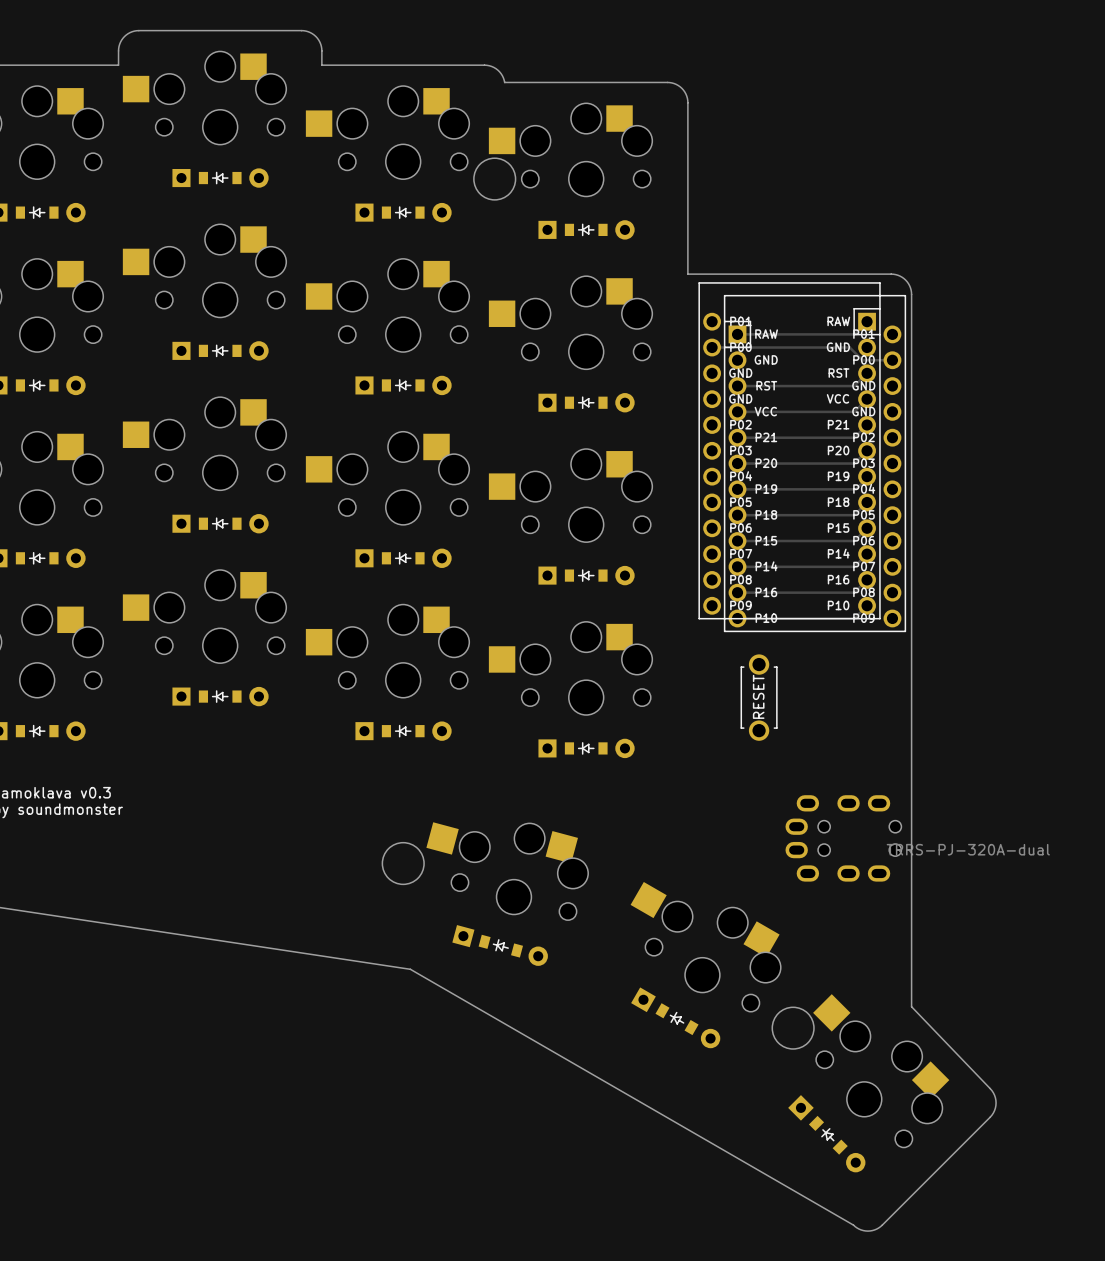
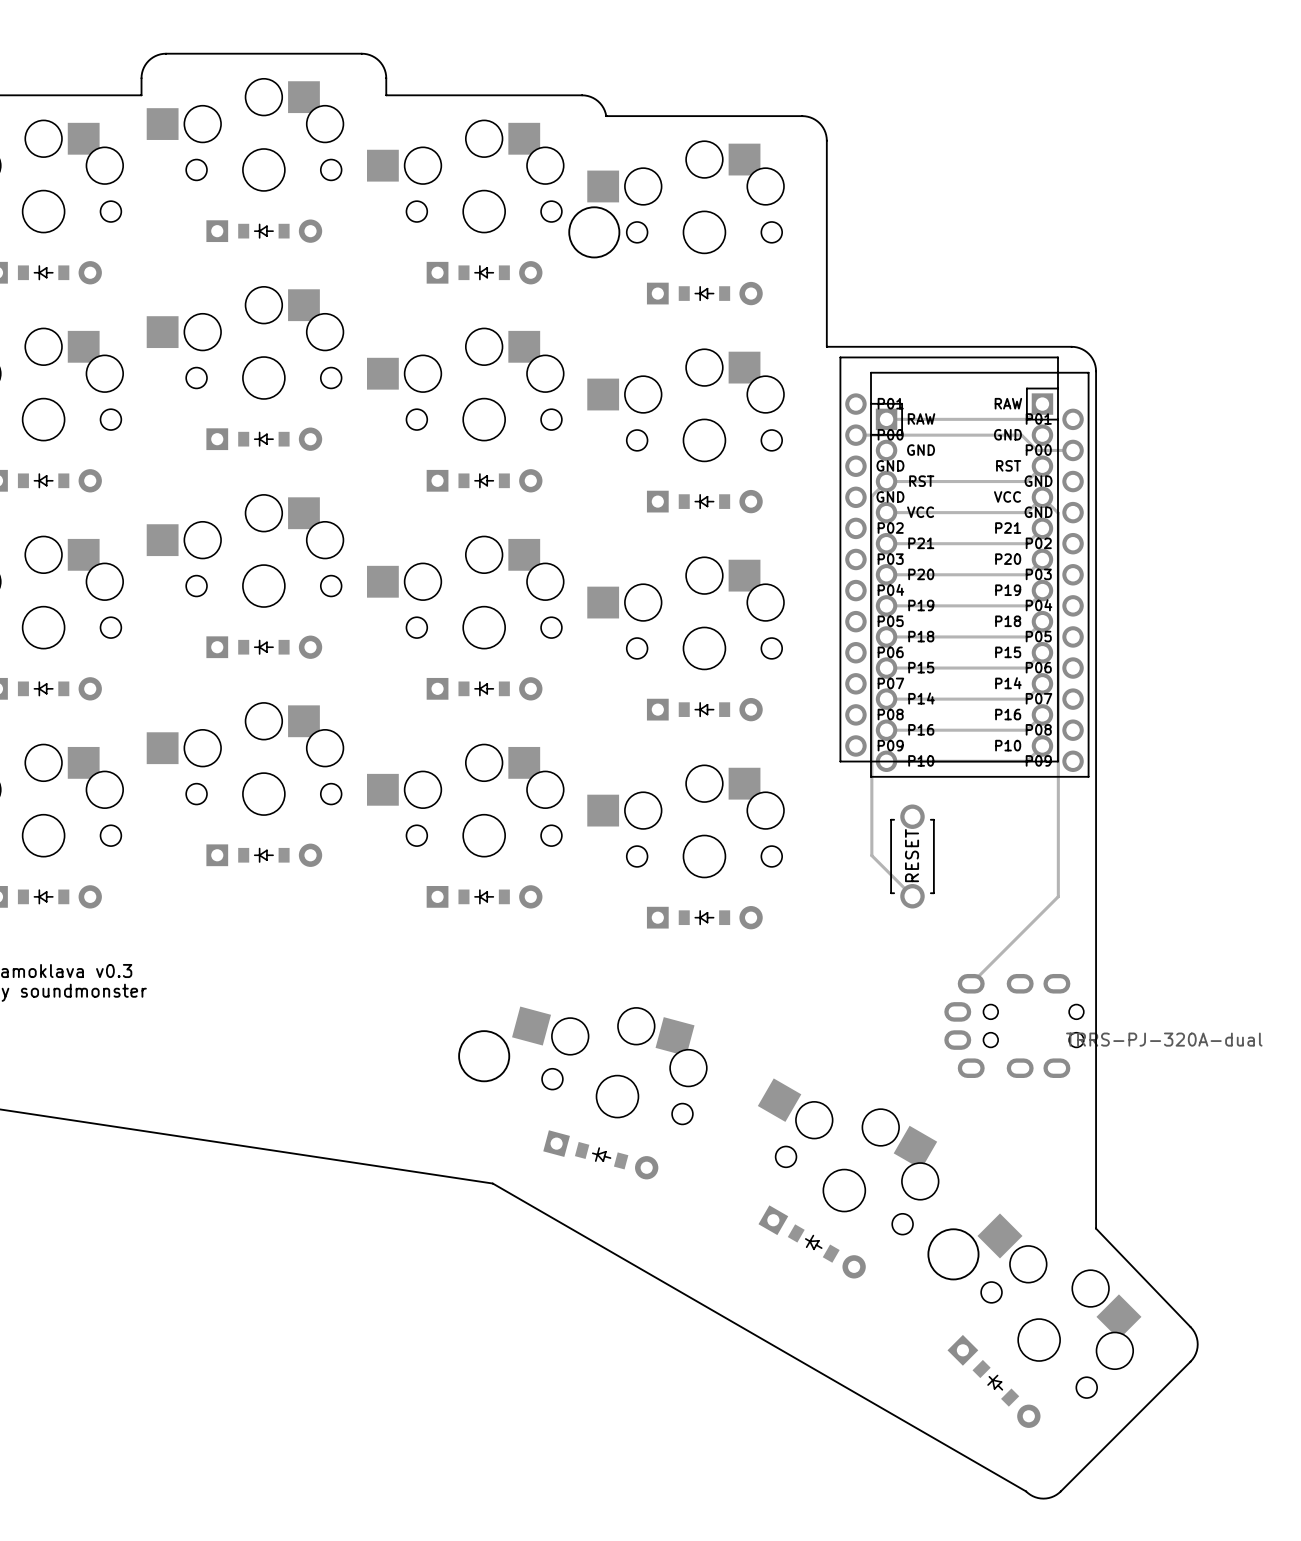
track: none -> (886, 481) (871, 496) (871, 855) (912, 896)
track: none -> (1042, 497) (1058, 513) (1058, 896) (971, 983)

